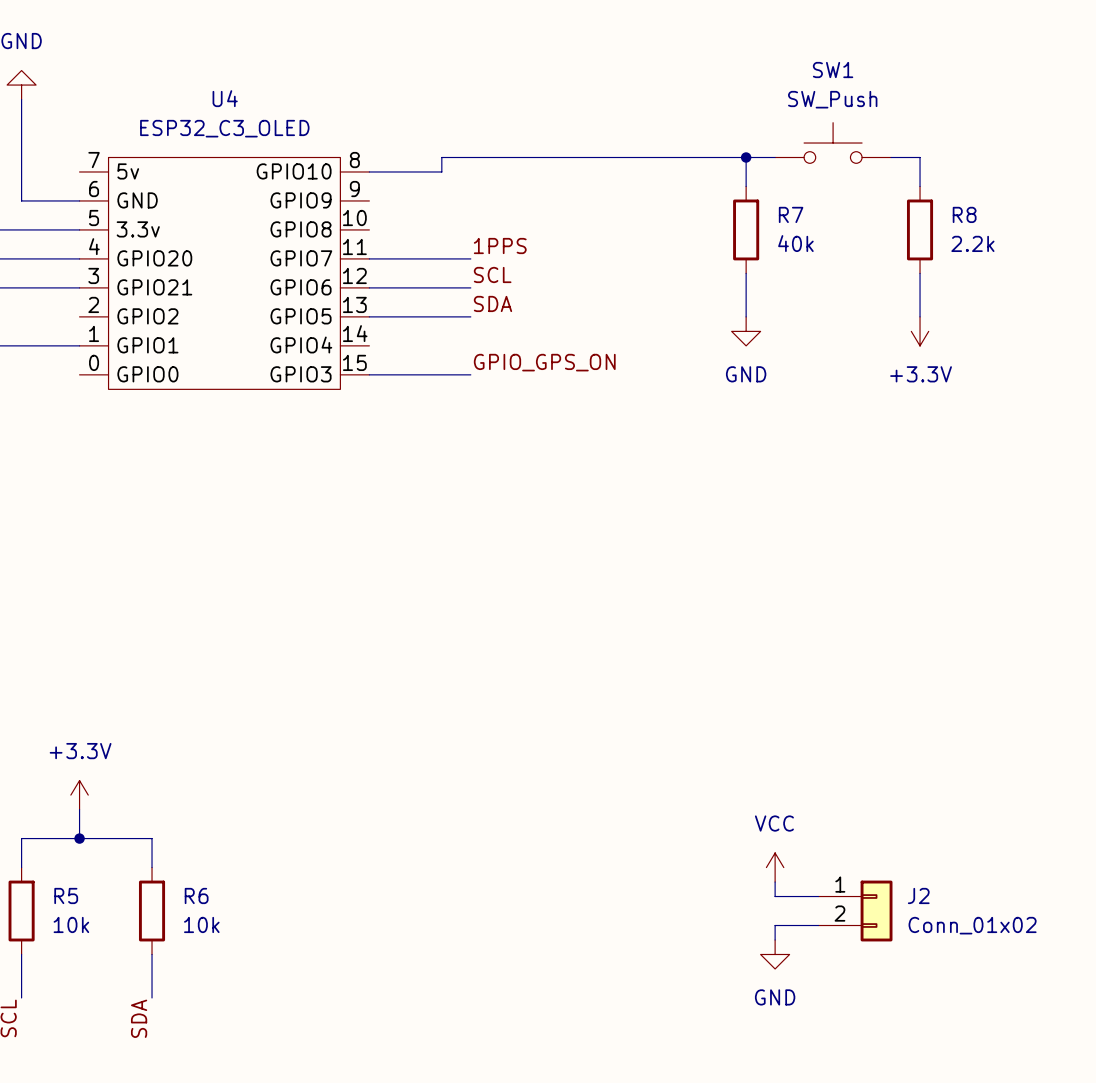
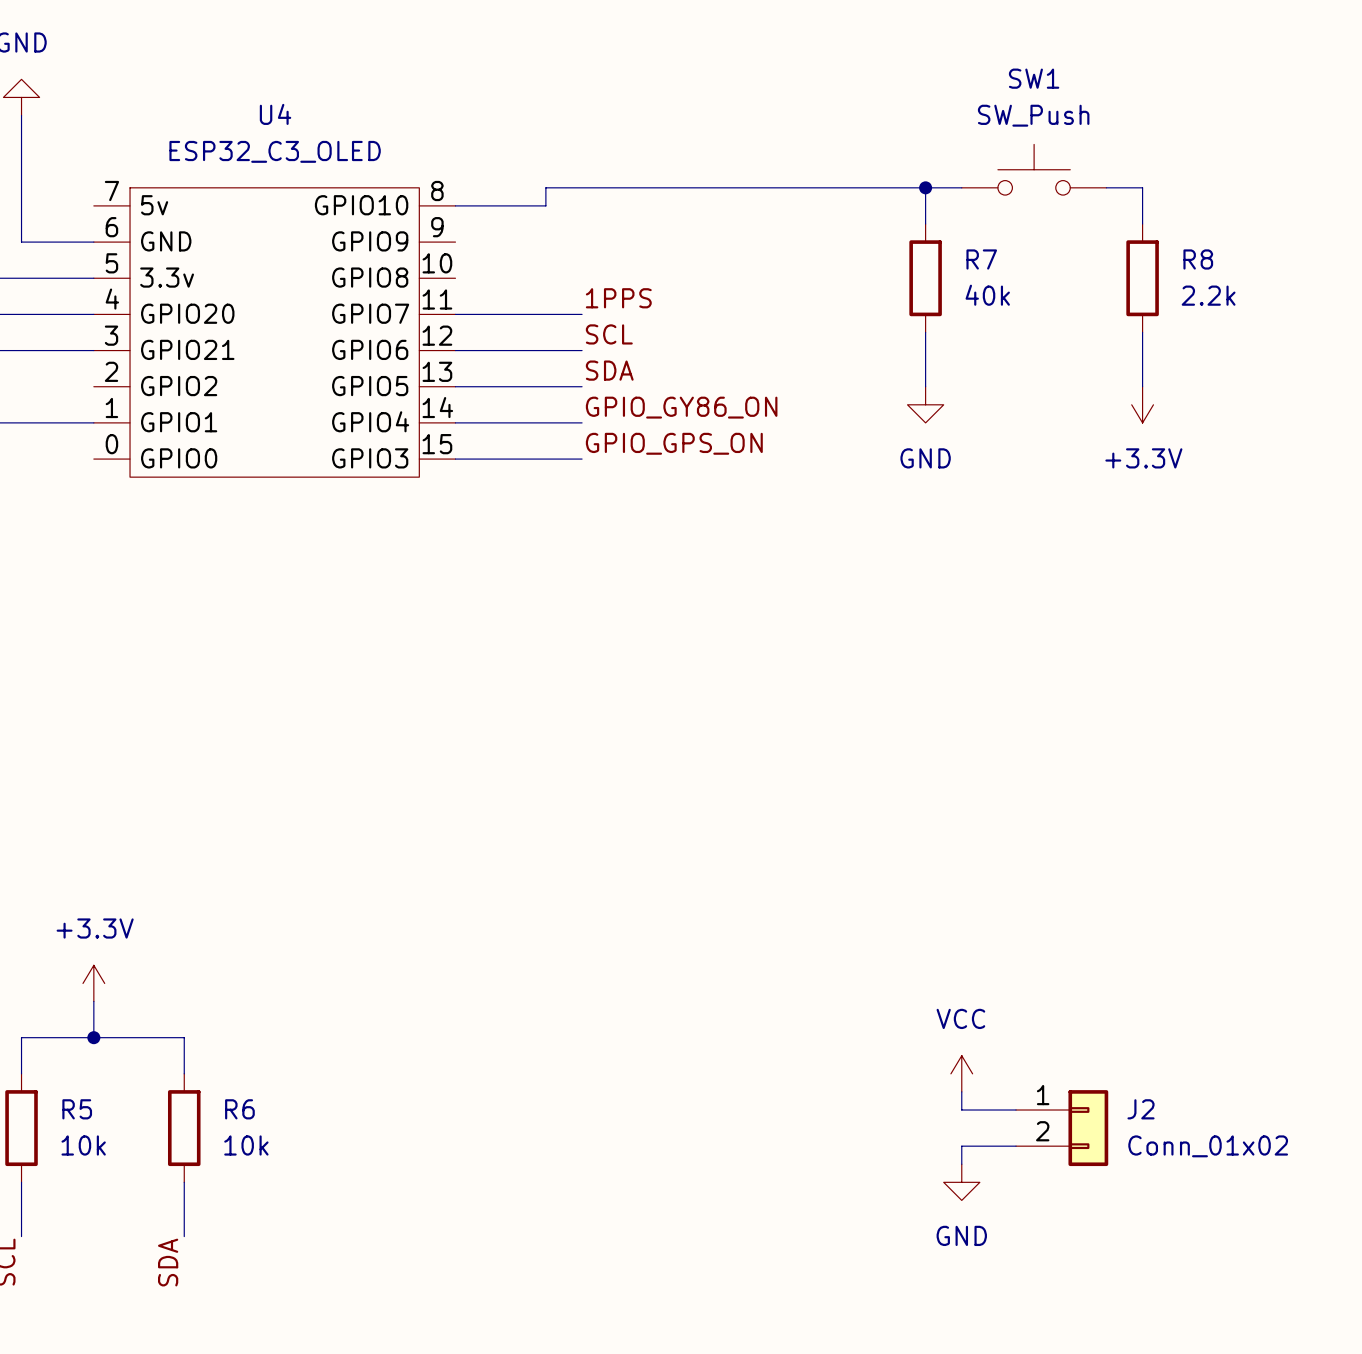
label: none -> GPIO_GY86_ON (681, 407)
wire: none -> (455, 422) (582, 422)

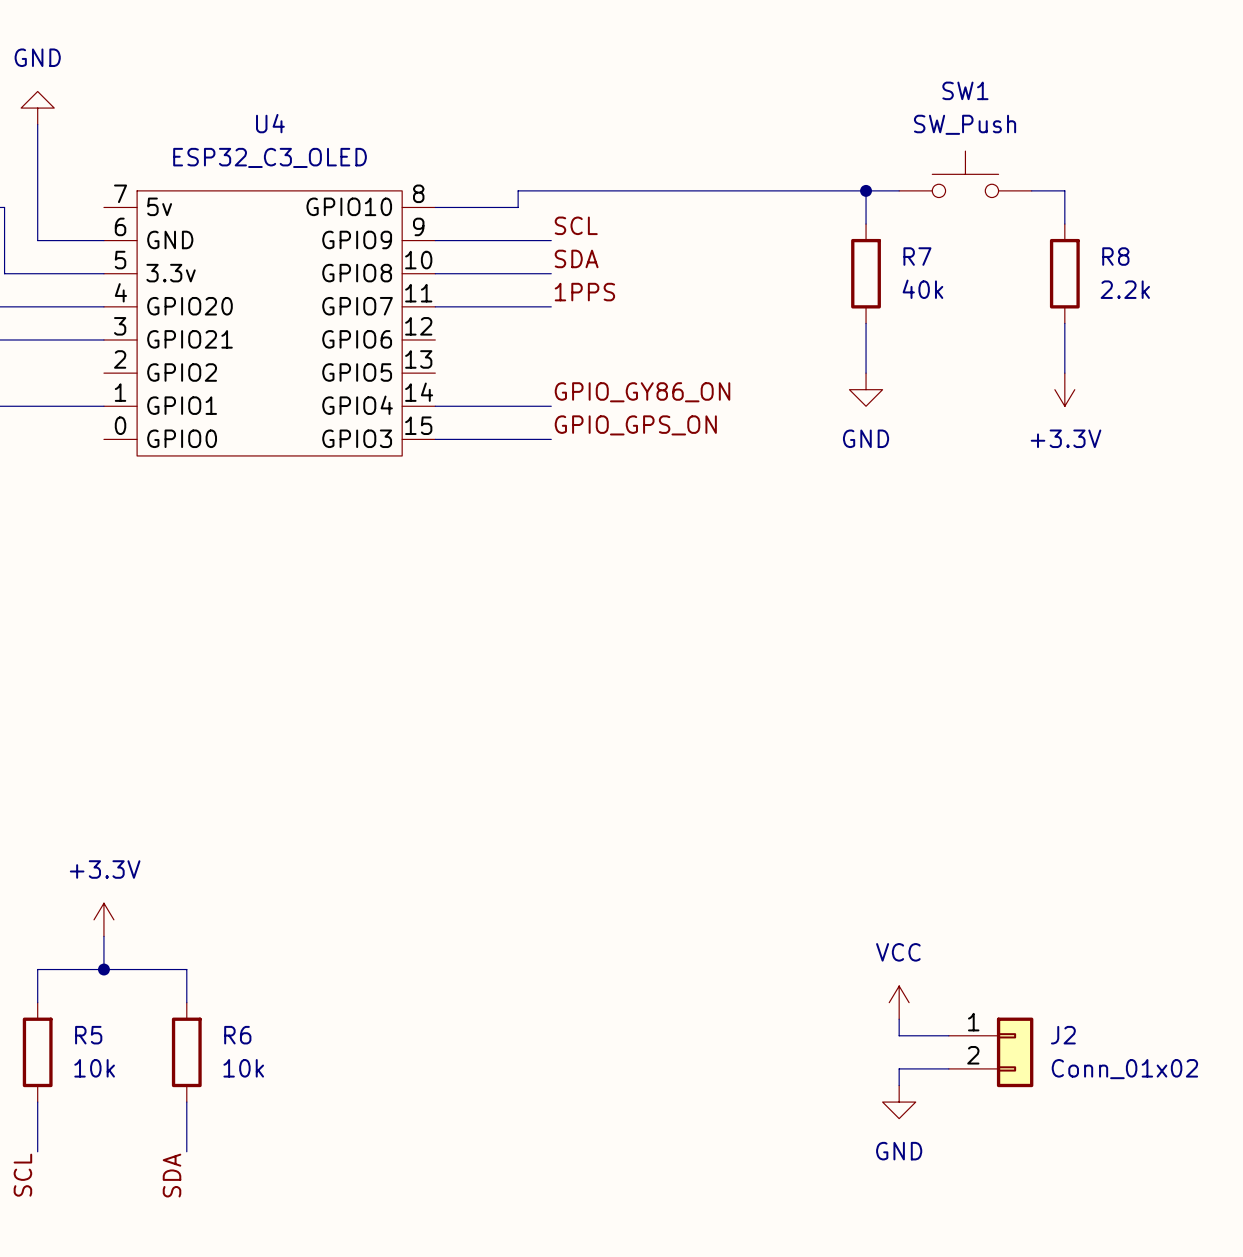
label position: SCL (609, 334) -> SCL (576, 225)
wire: (455, 350) (582, 350) -> (435, 273) (551, 273)
label position: SDA (609, 370) -> SDA (576, 258)
wire: (455, 386) (582, 386) -> (435, 240) (551, 240)

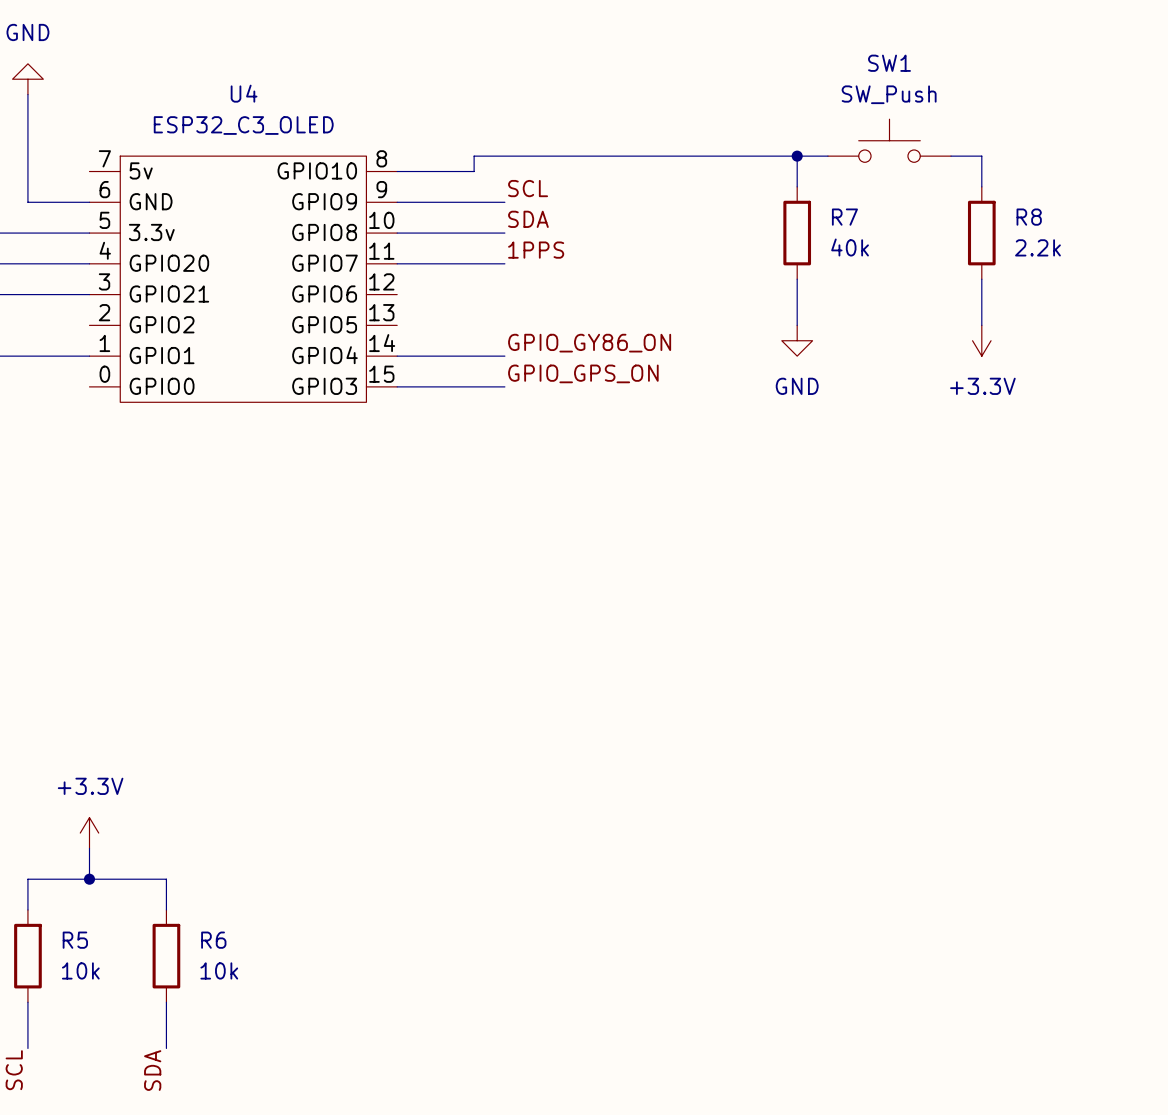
power symbol: VCC (899, 1002) -> none
wire: (899, 1019) (899, 1035) (948, 1035) -> none
J2: Conn_01x02 (991, 1052) -> none
wire: (948, 1068) (899, 1068) (899, 1085) -> none
power symbol: GND (899, 1102) -> none

